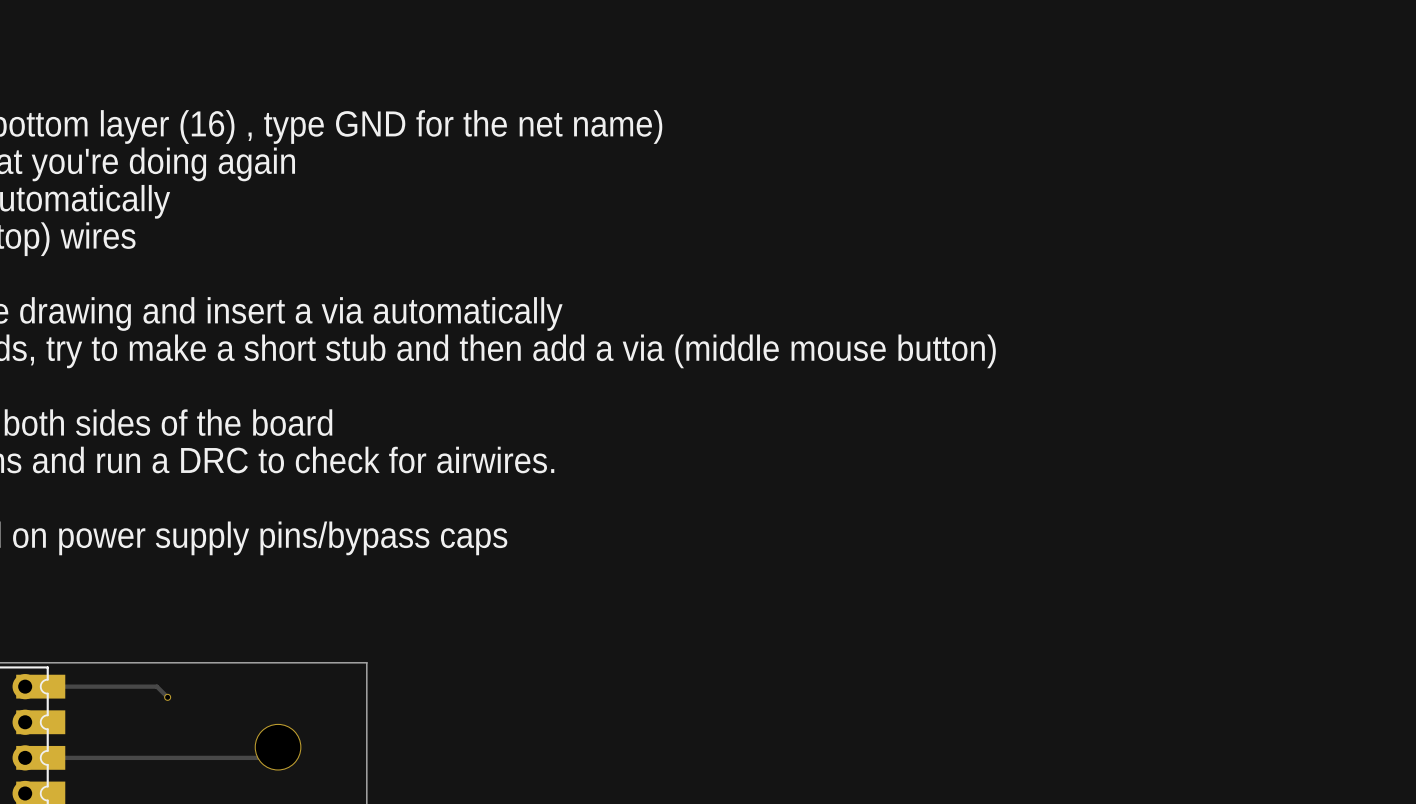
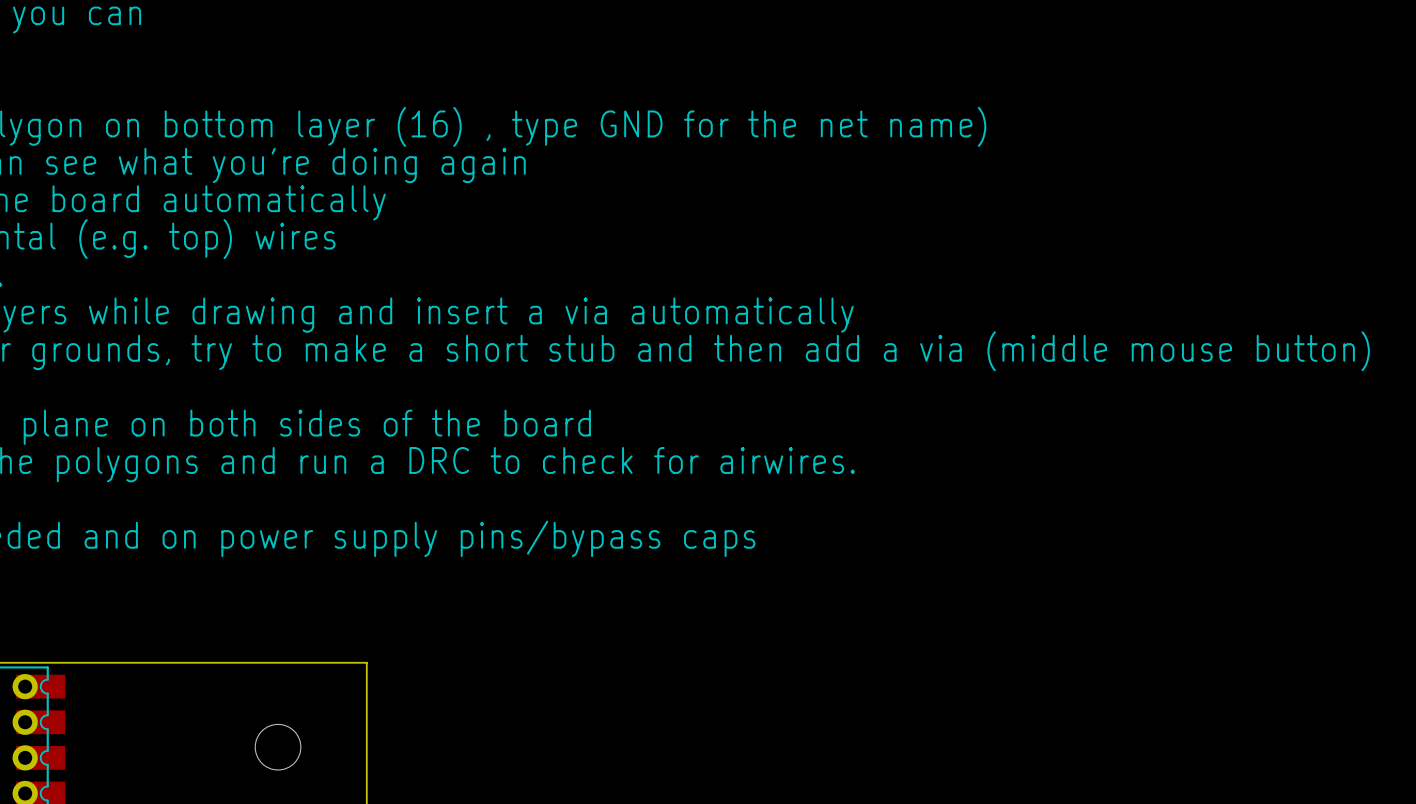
track: (40, 686) (156, 686) (167, 697) -> none
via: (167, 697) -> none
track: (278, 747) (267, 757) (40, 757) (37, 761) (28, 761) (25, 757) -> none

